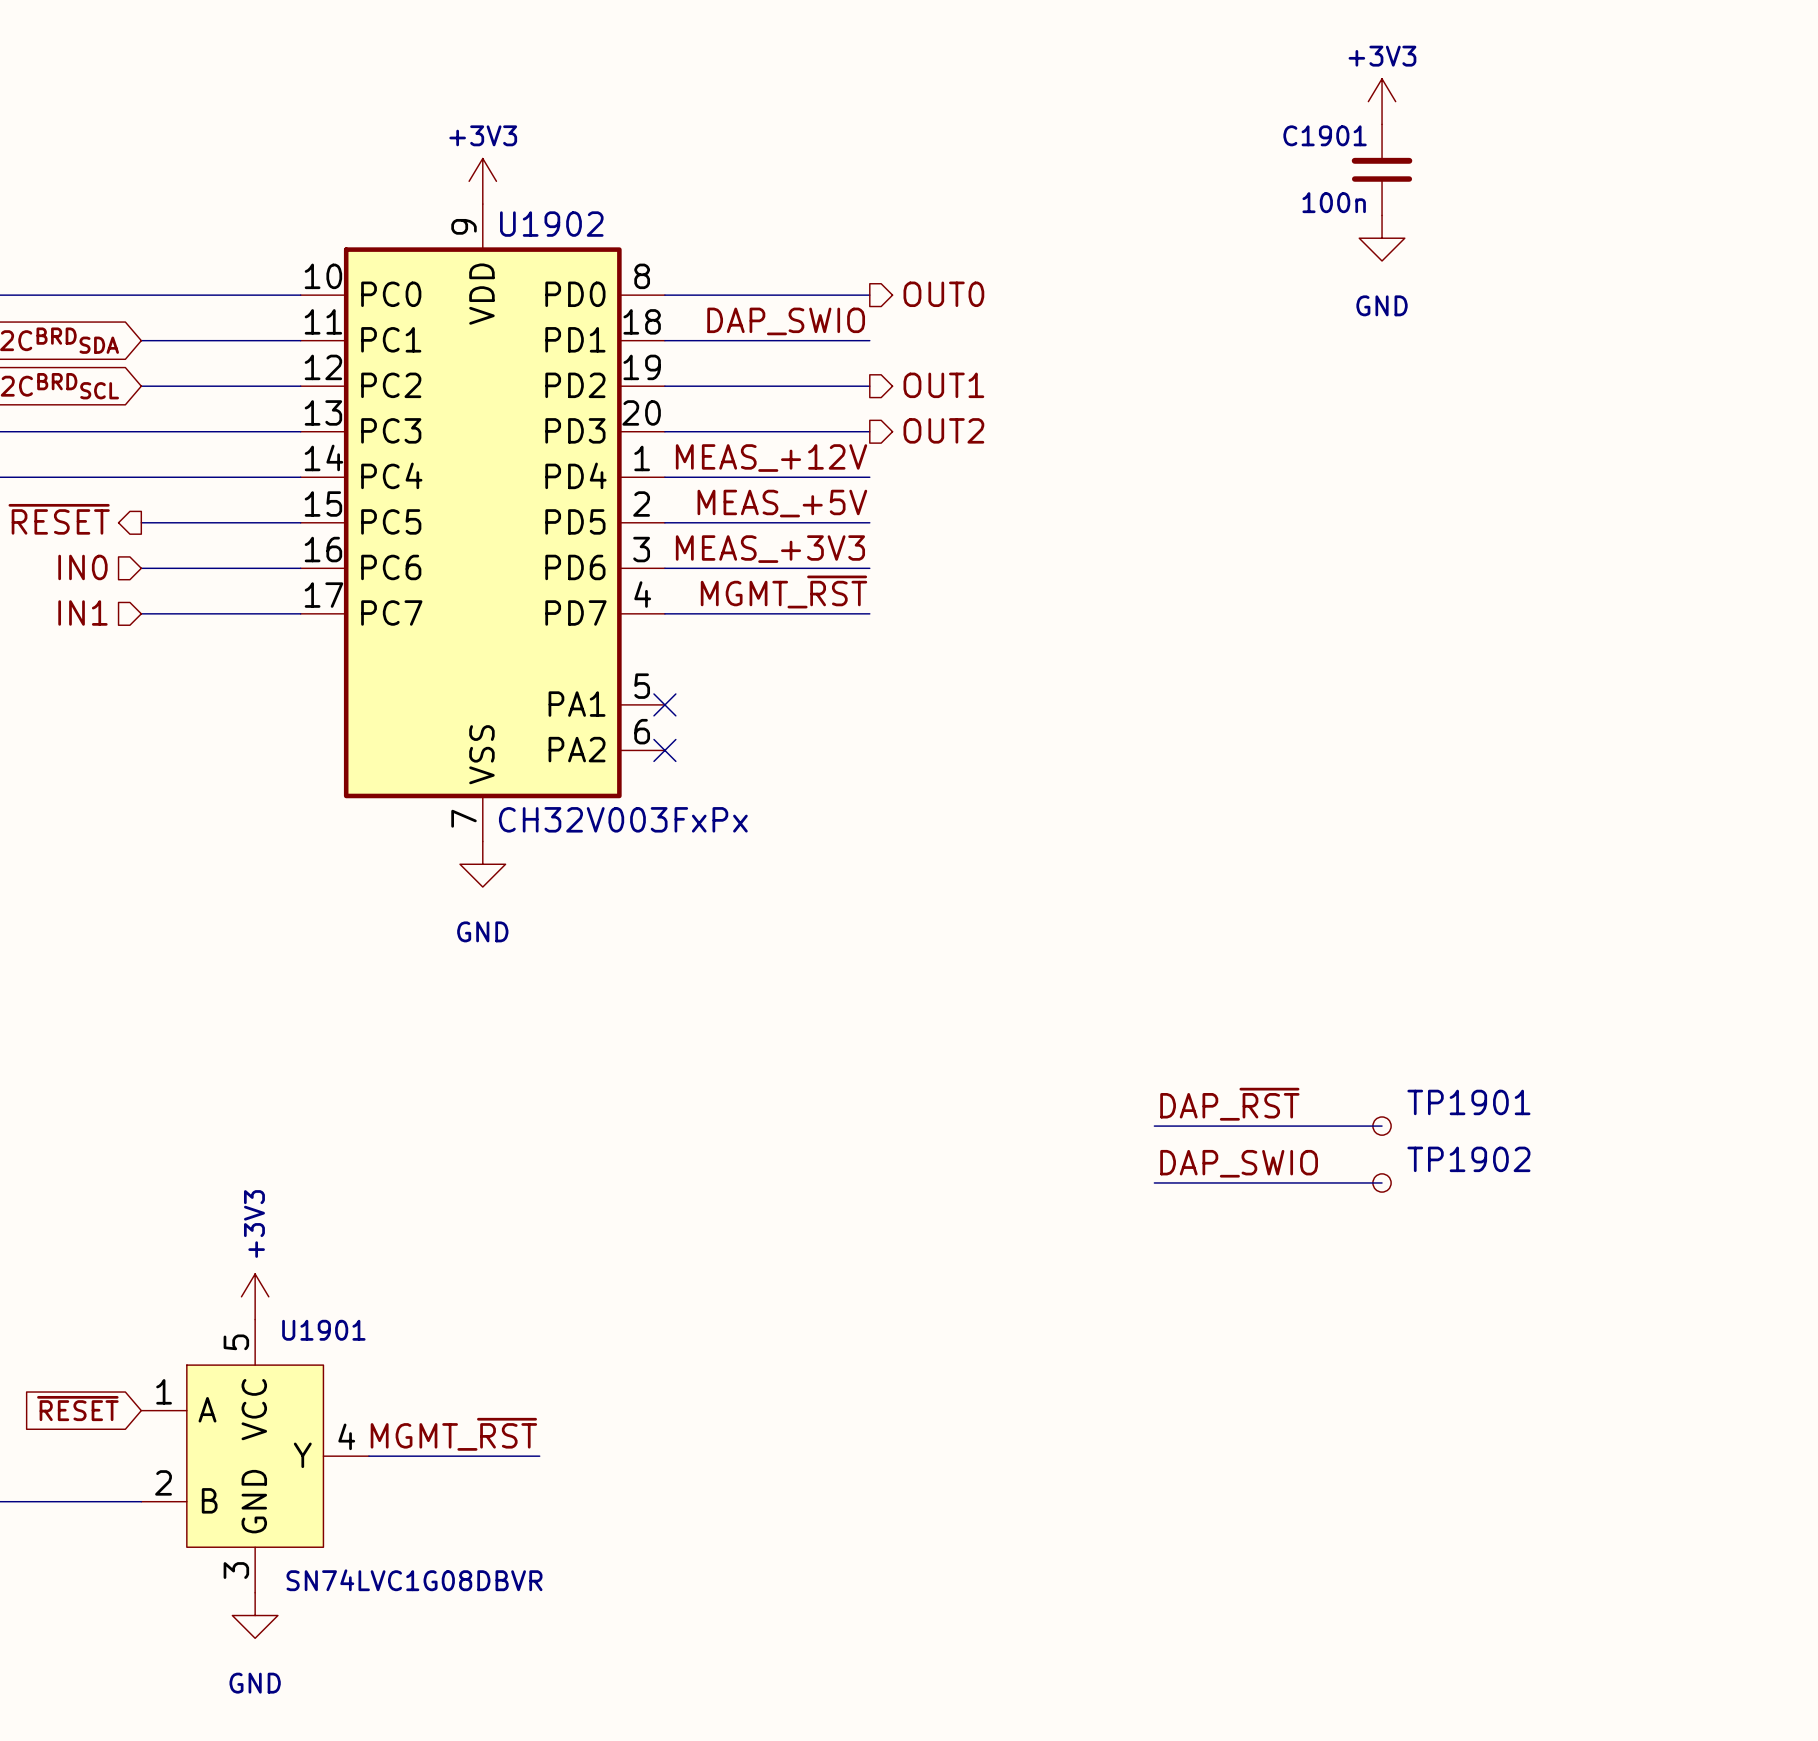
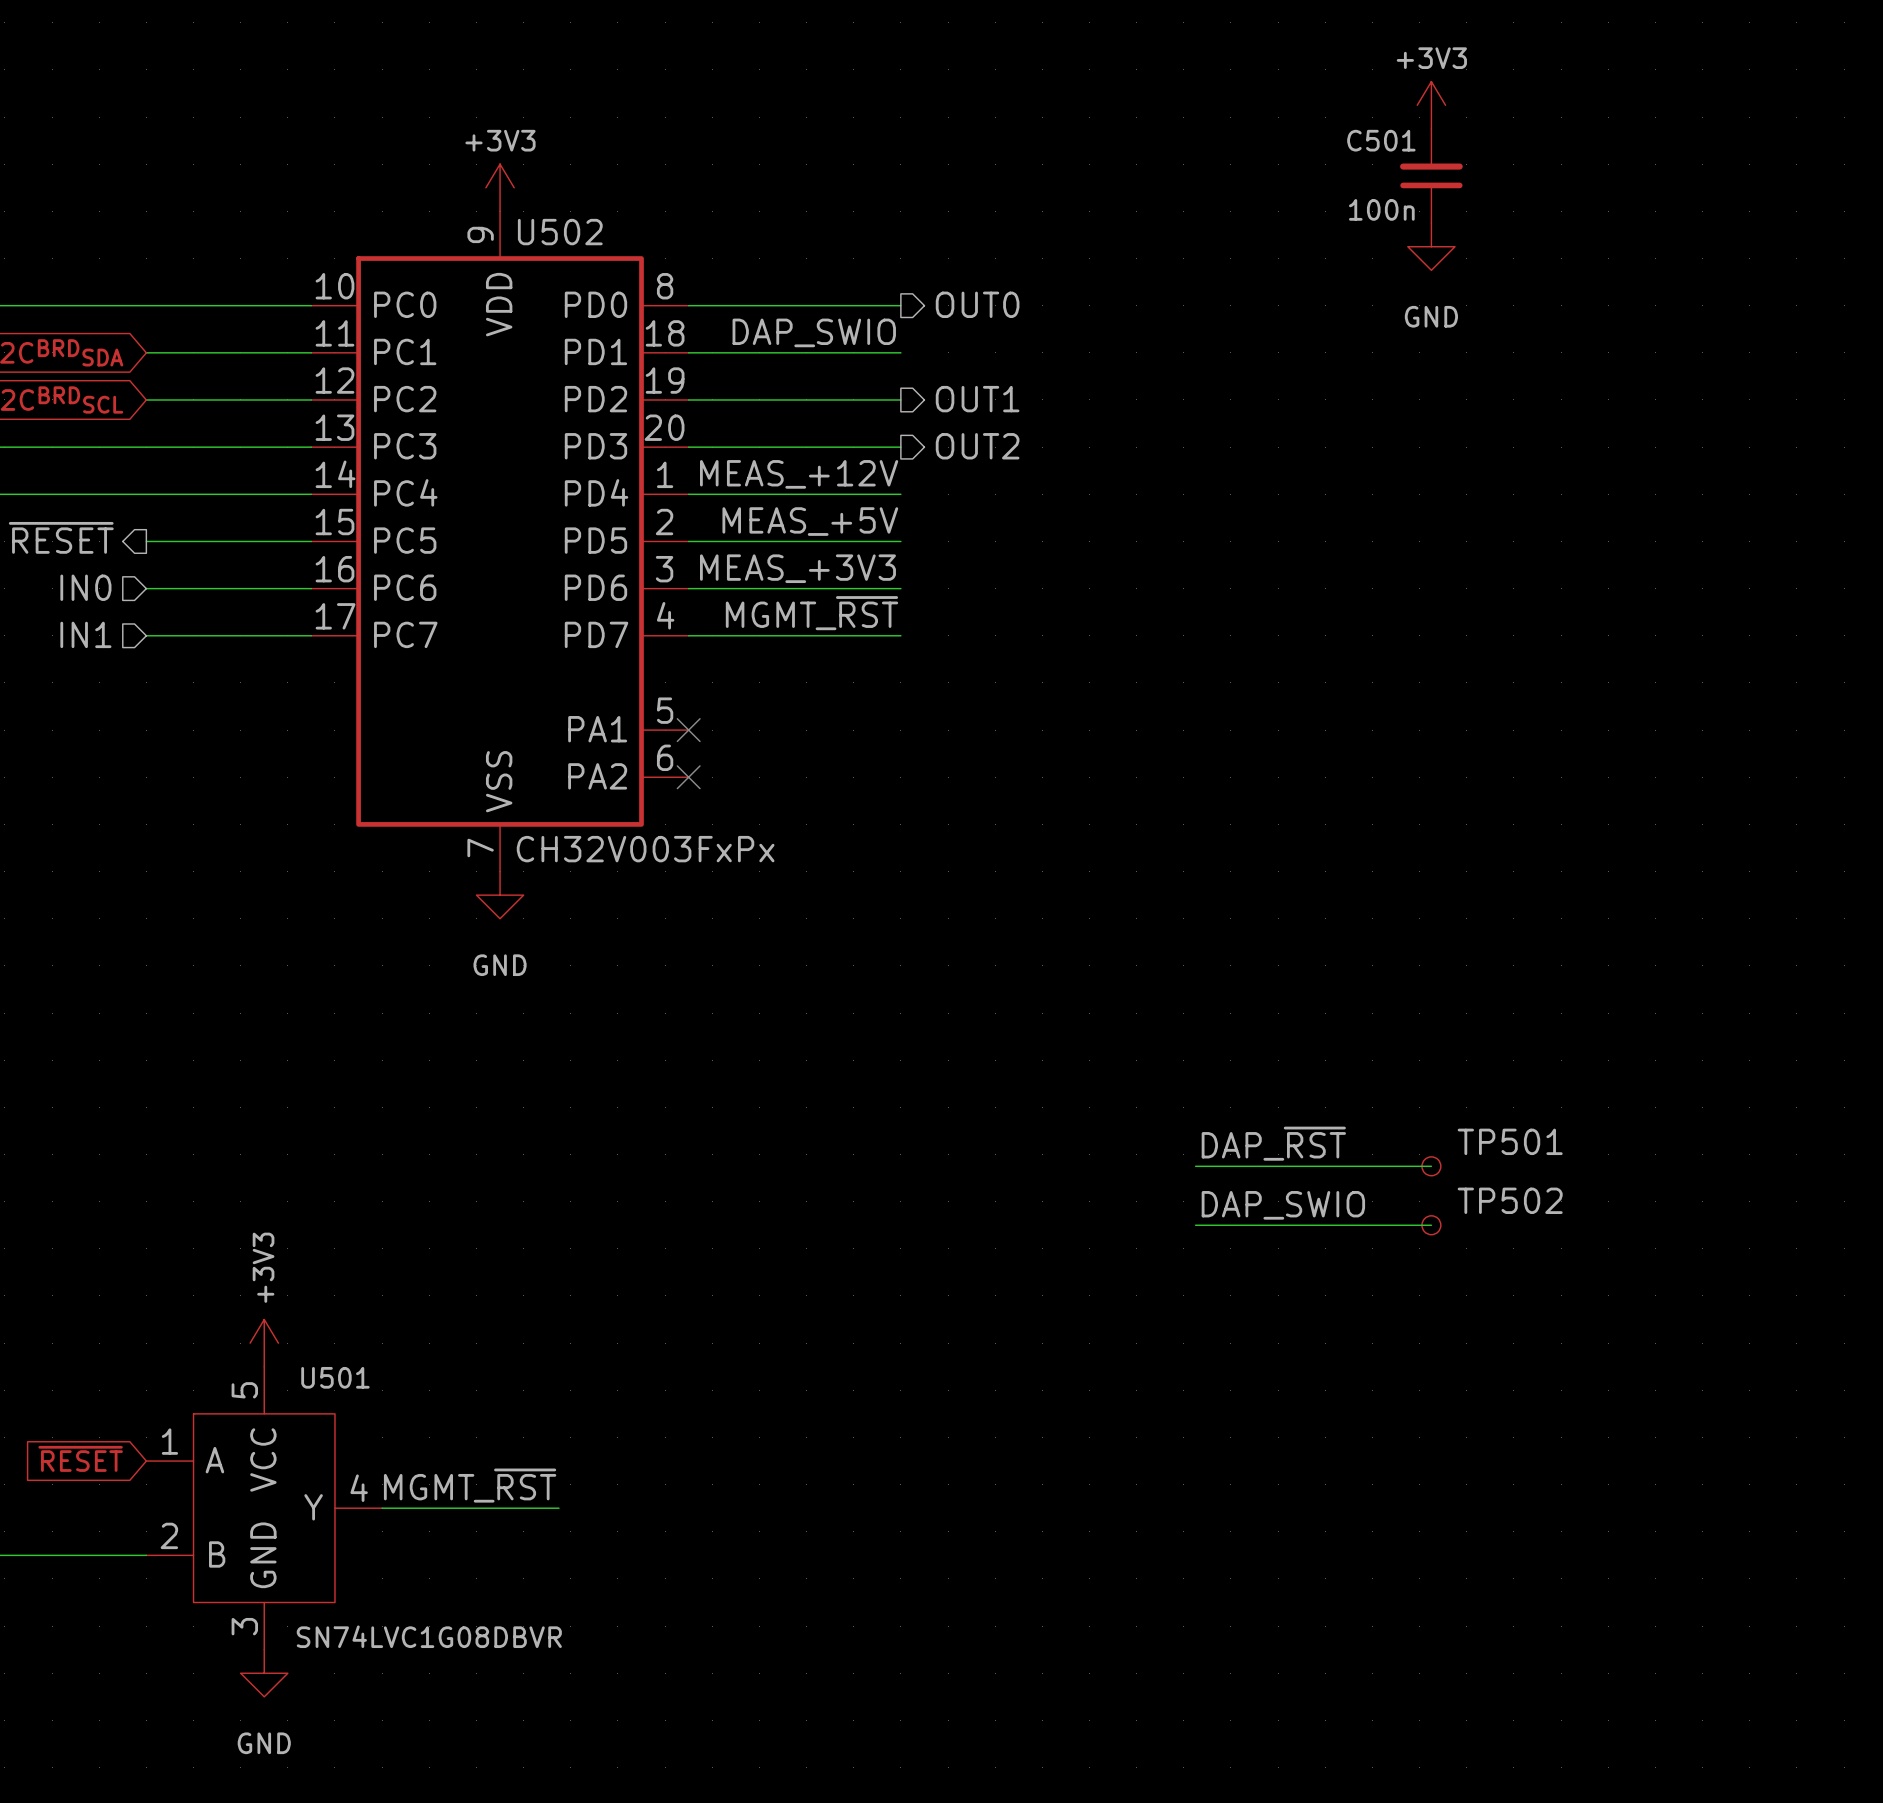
C1901 name: C1901 (1325, 135) -> C501 (1381, 140)
U1902 name: U1902 (551, 224) -> U502 (560, 232)
TP1901 name: TP1901 (1468, 1102) -> TP501 (1510, 1141)
TP1902 name: TP1902 (1468, 1159) -> TP502 (1510, 1200)
U1901 name: U1901 (323, 1330) -> U501 (335, 1377)

